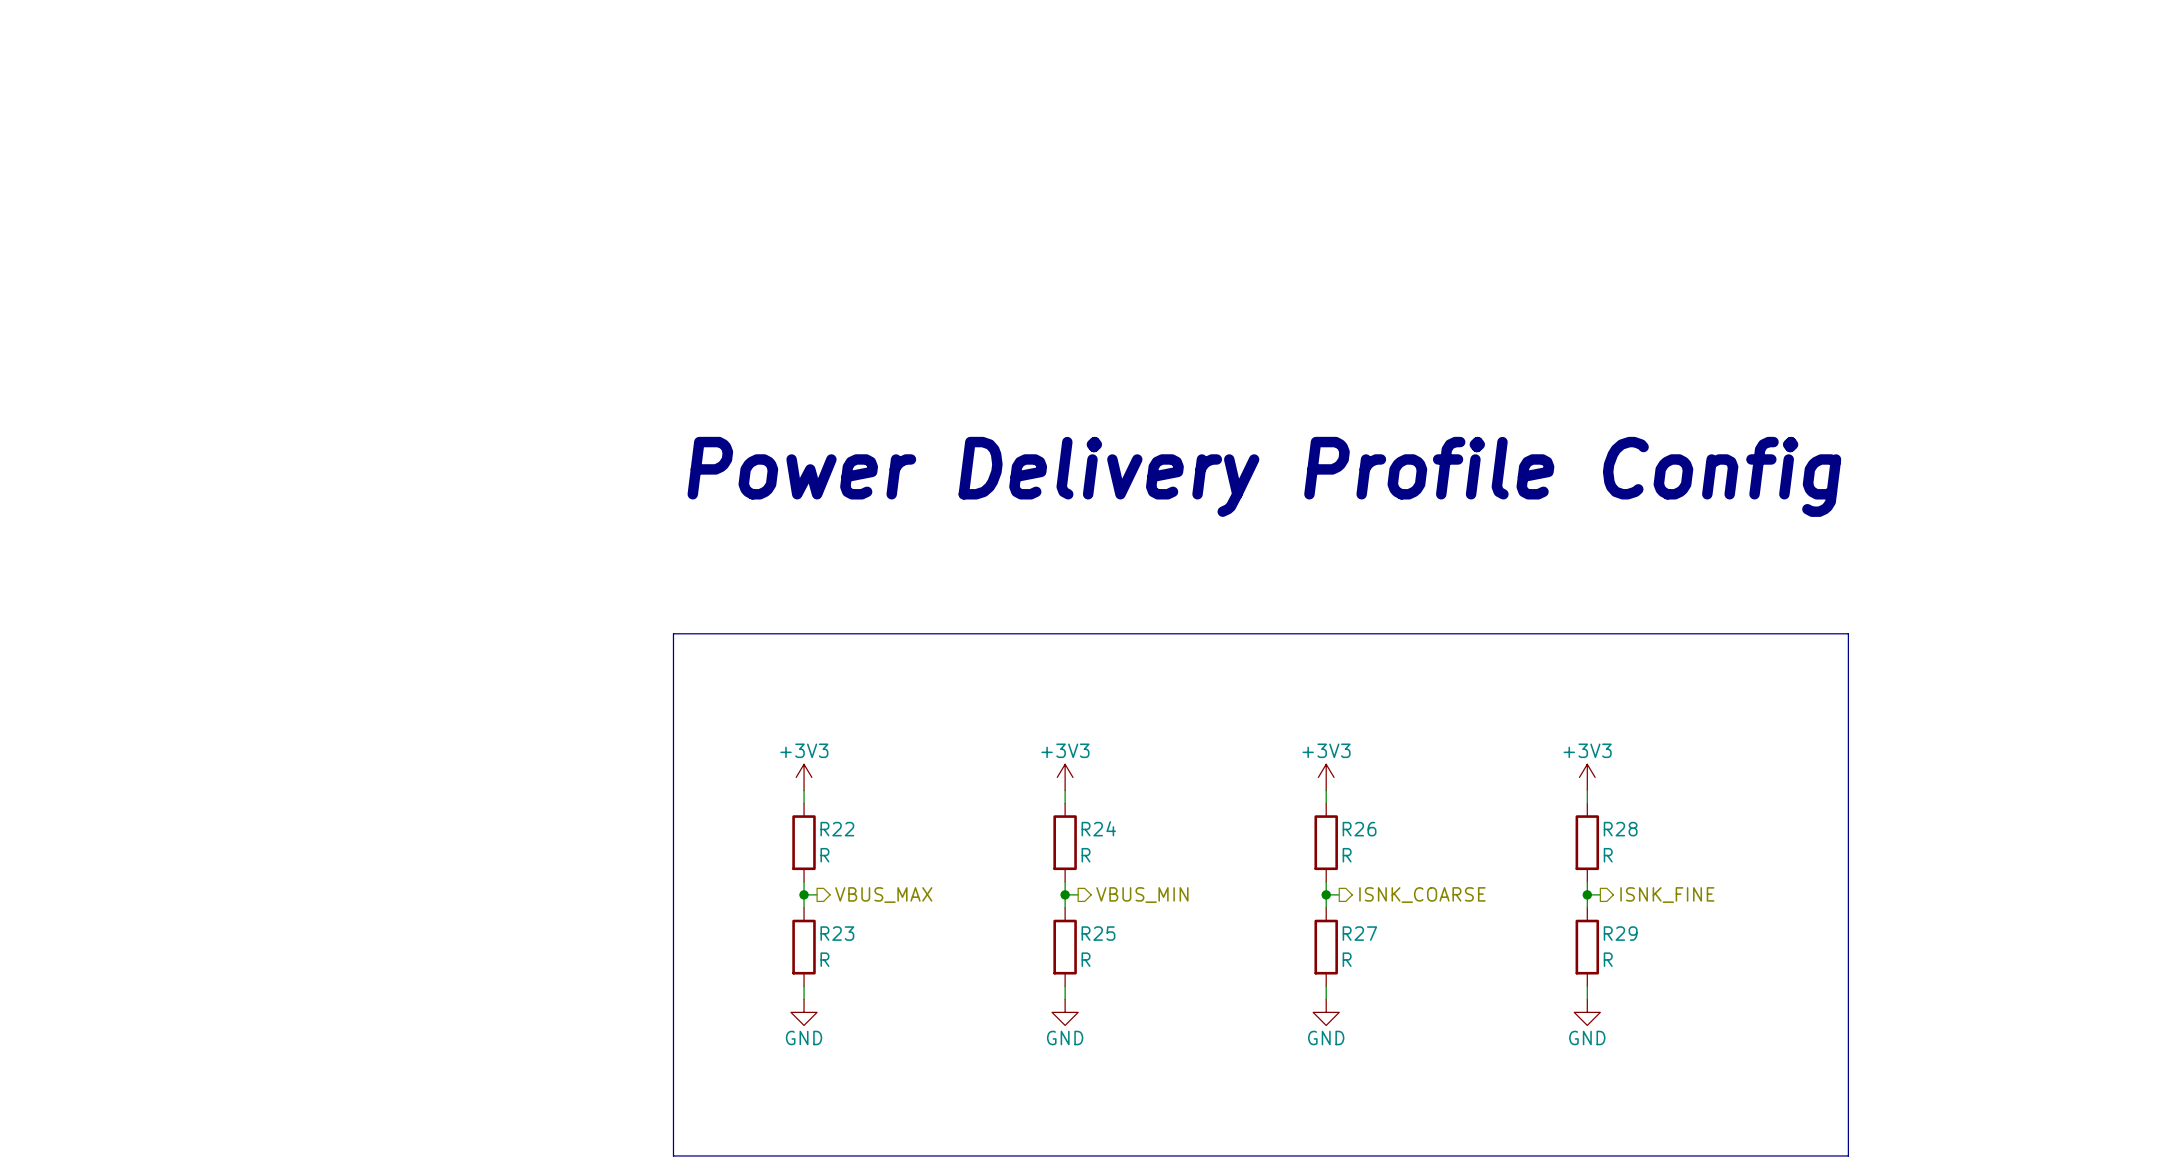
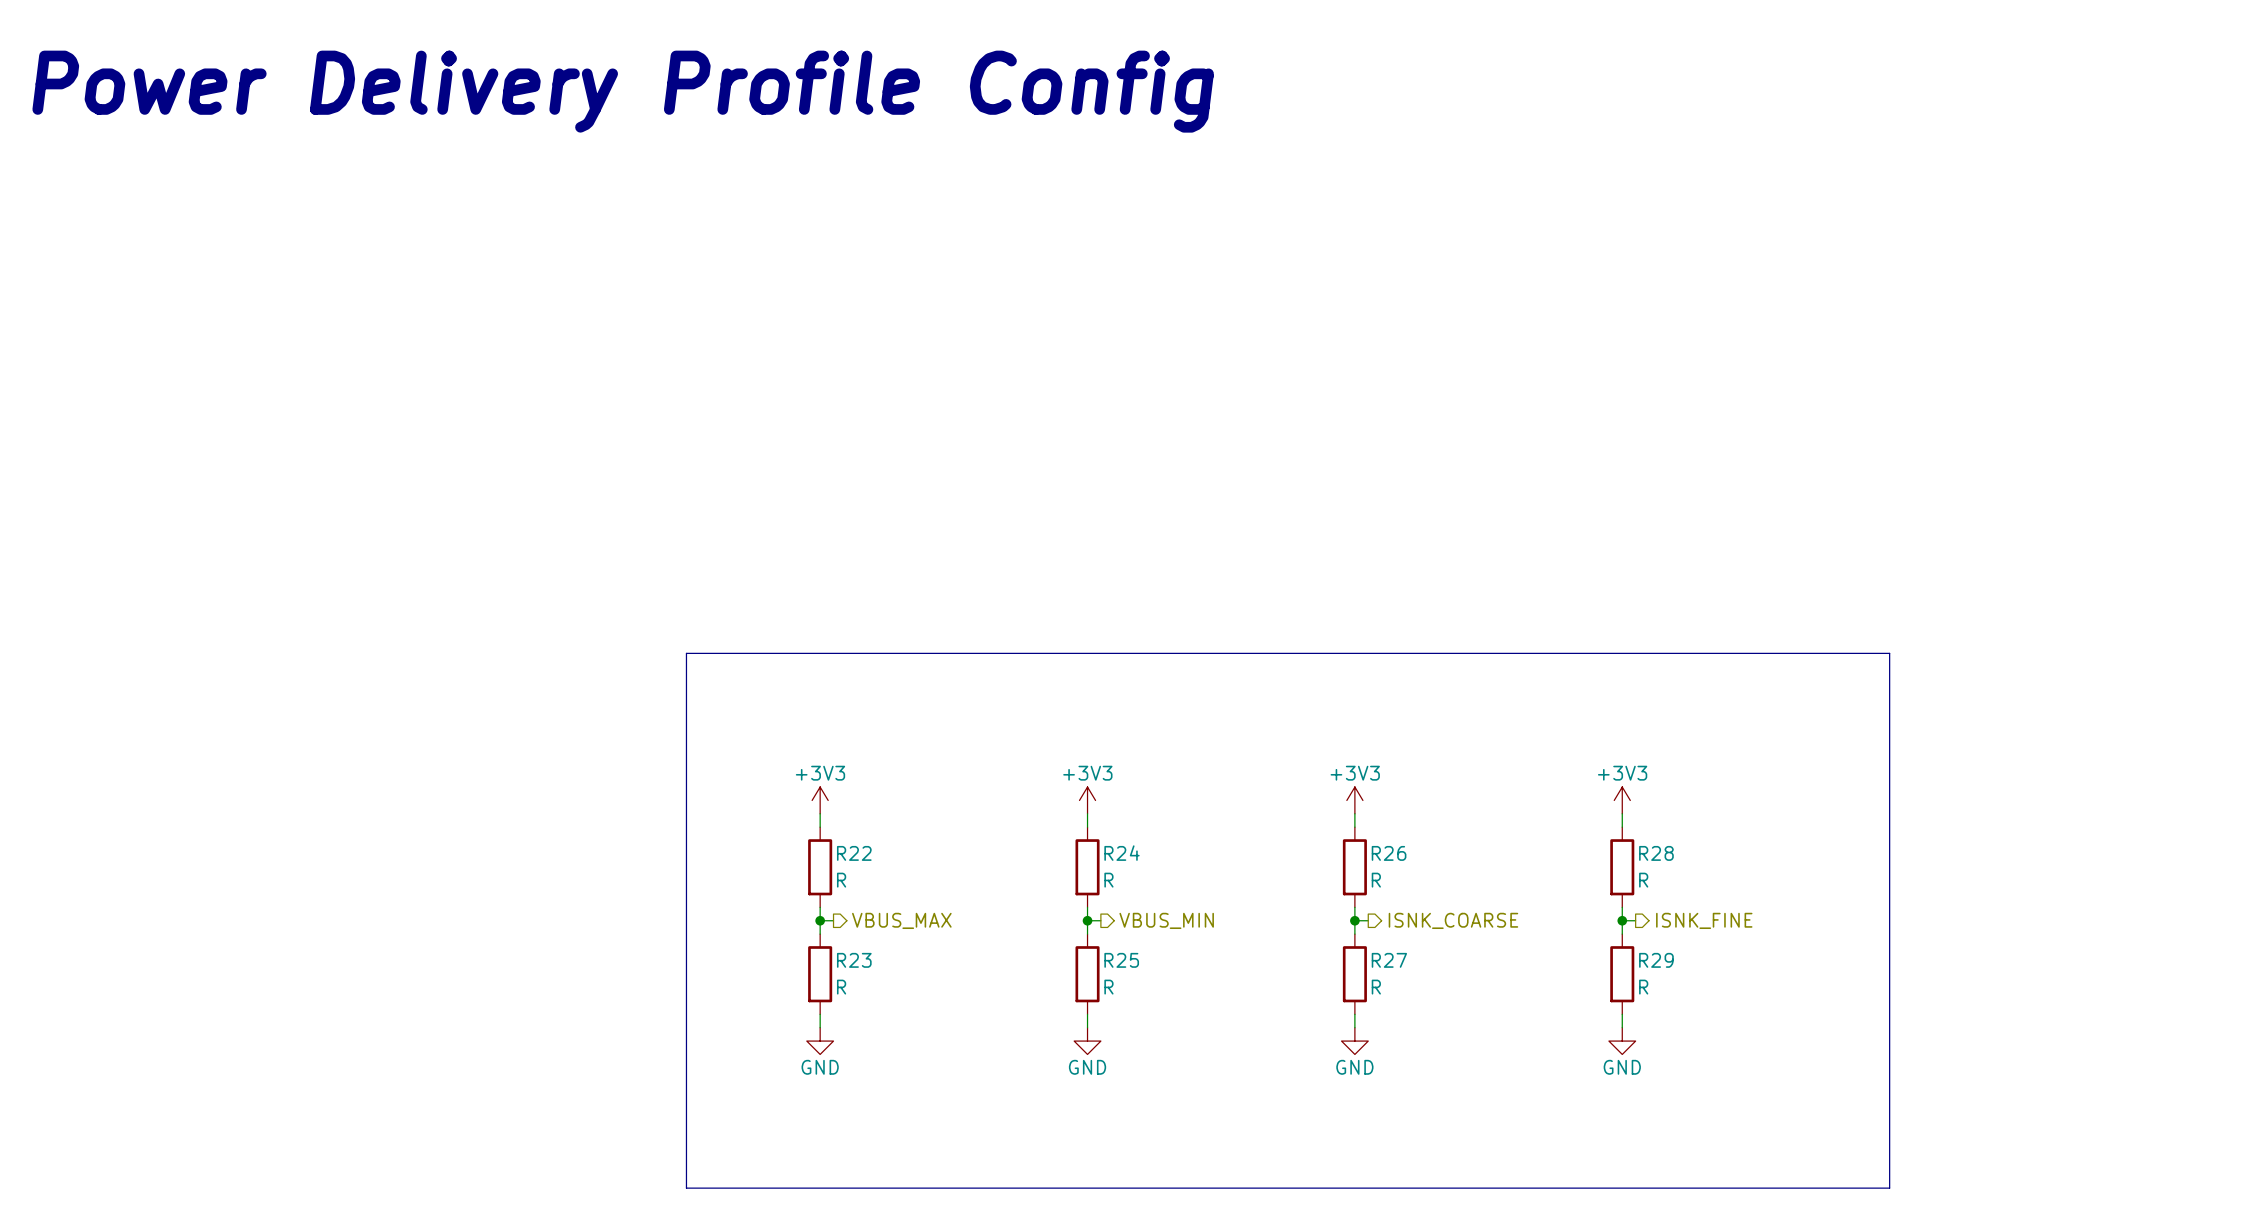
text: none -> Power Delivery Profile Config (623, 91)
text: Power Delivery Profile Config (1264, 476) -> none

